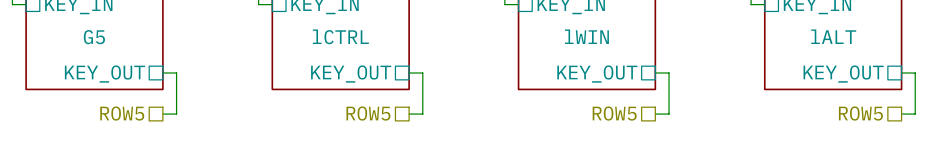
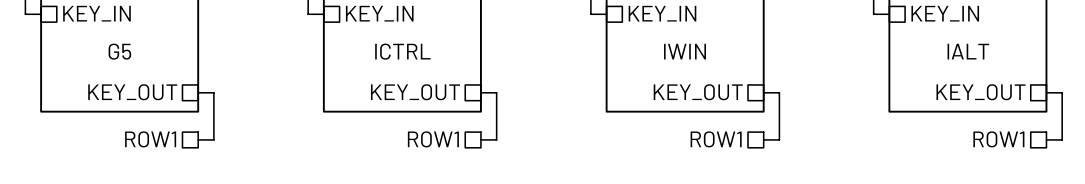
hierarchical label: ROW5 (122, 113) -> ROW1 (150, 139)
hierarchical label: ROW5 (368, 113) -> ROW1 (433, 139)
hierarchical label: ROW5 (614, 113) -> ROW1 (716, 139)
hierarchical label: ROW5 (860, 113) -> ROW1 (998, 139)

